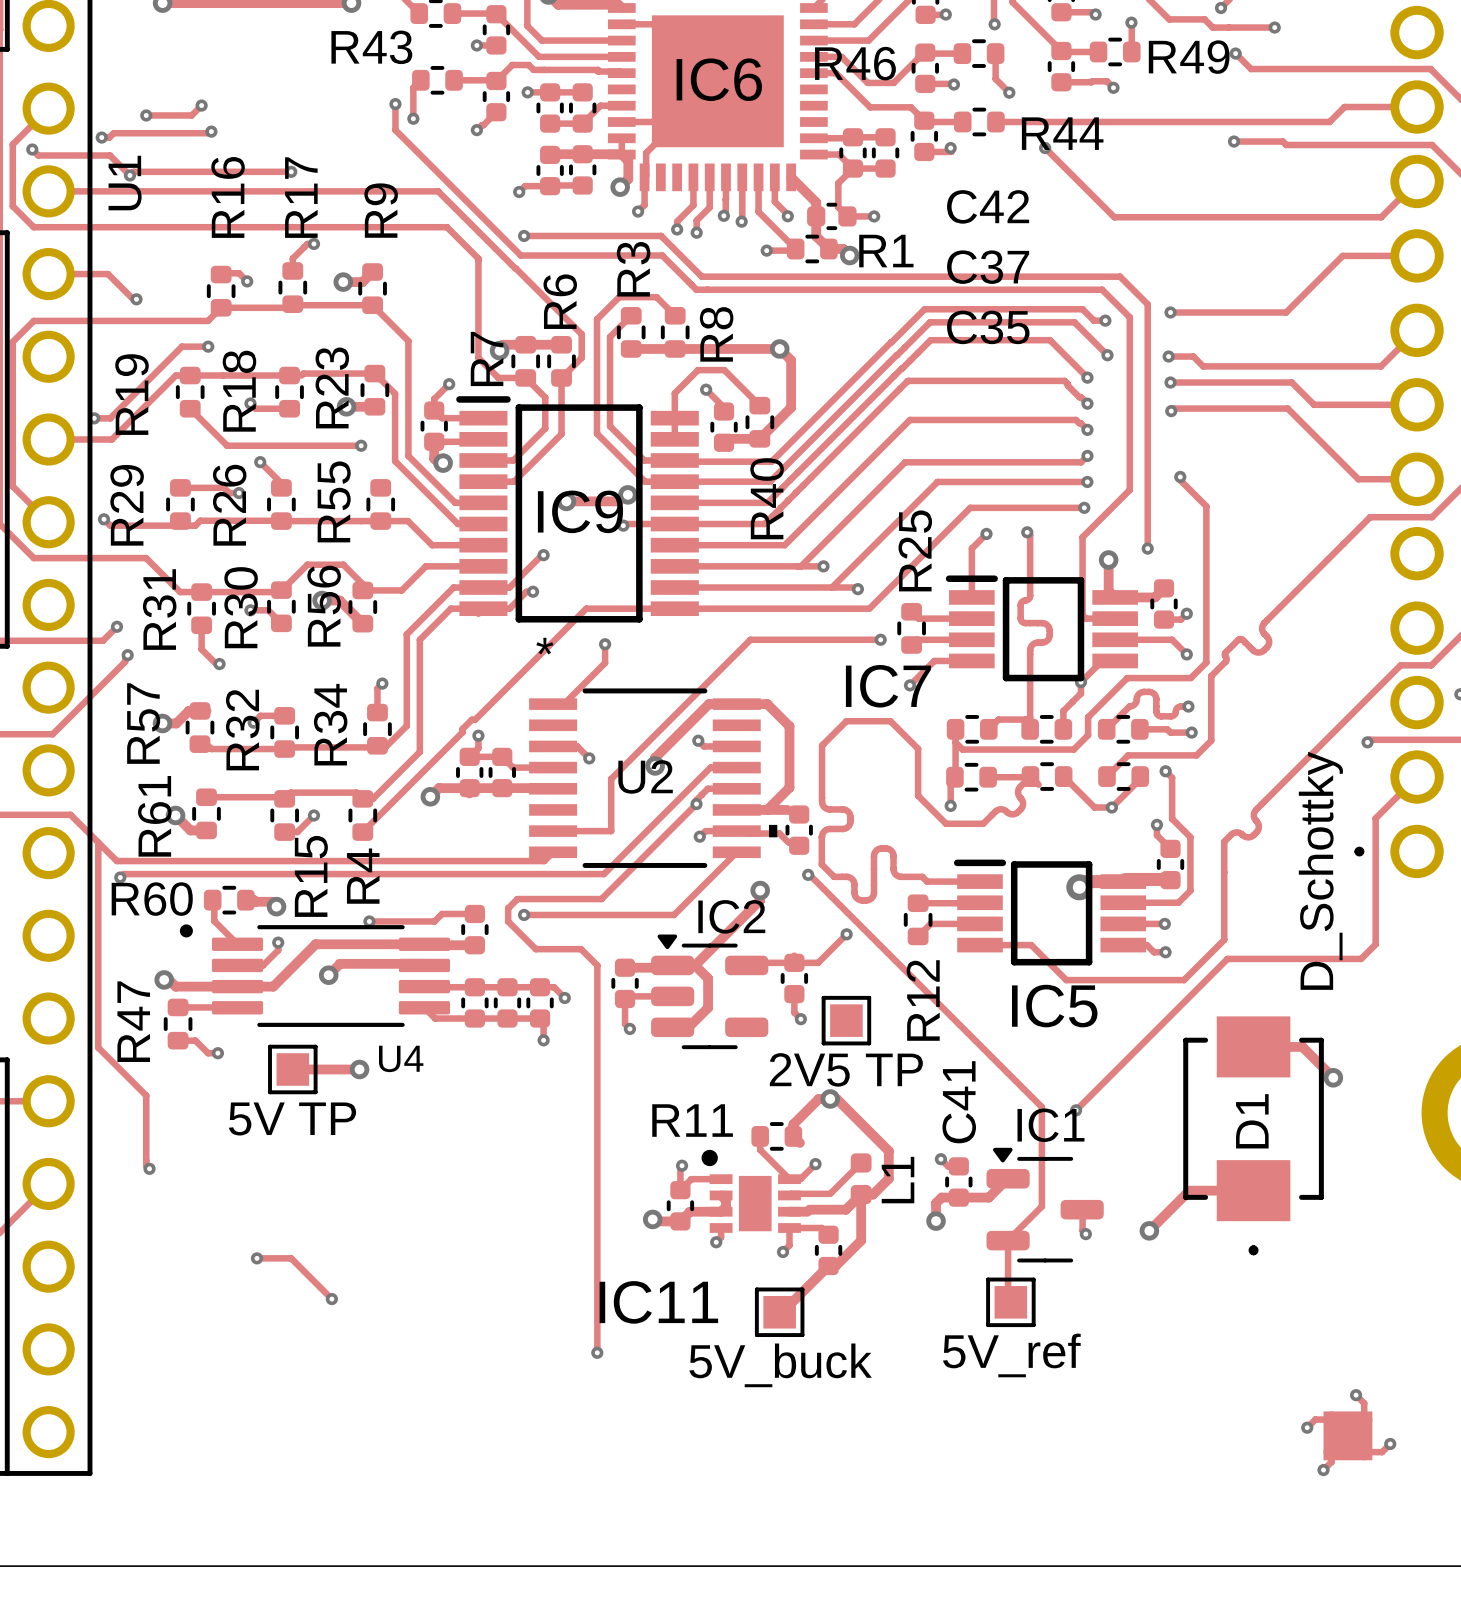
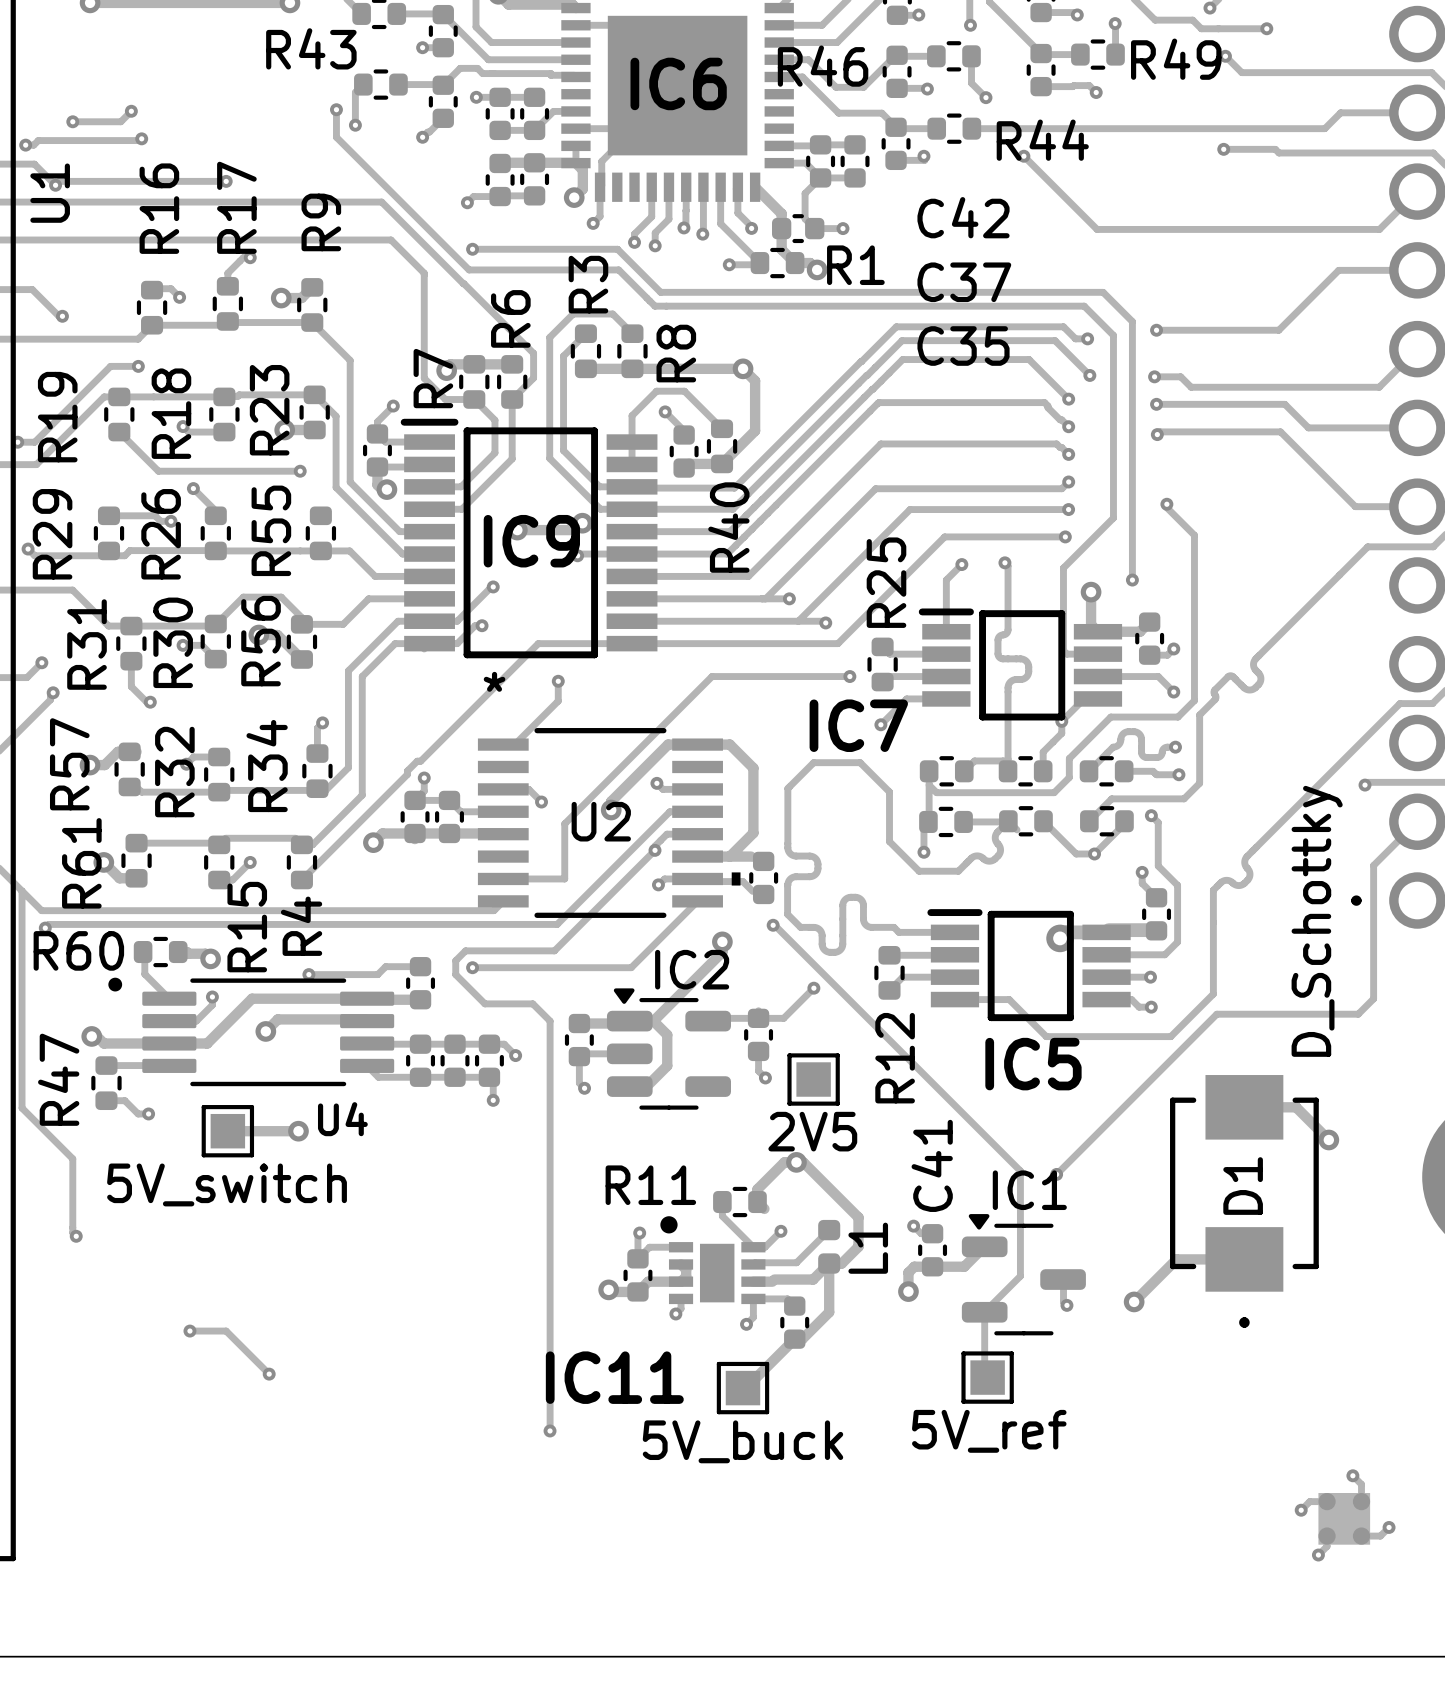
part value: 2V5 TP (846, 1069) -> 2V5 (812, 1131)
part value: 5V TP (292, 1118) -> 5V_switch (227, 1184)

